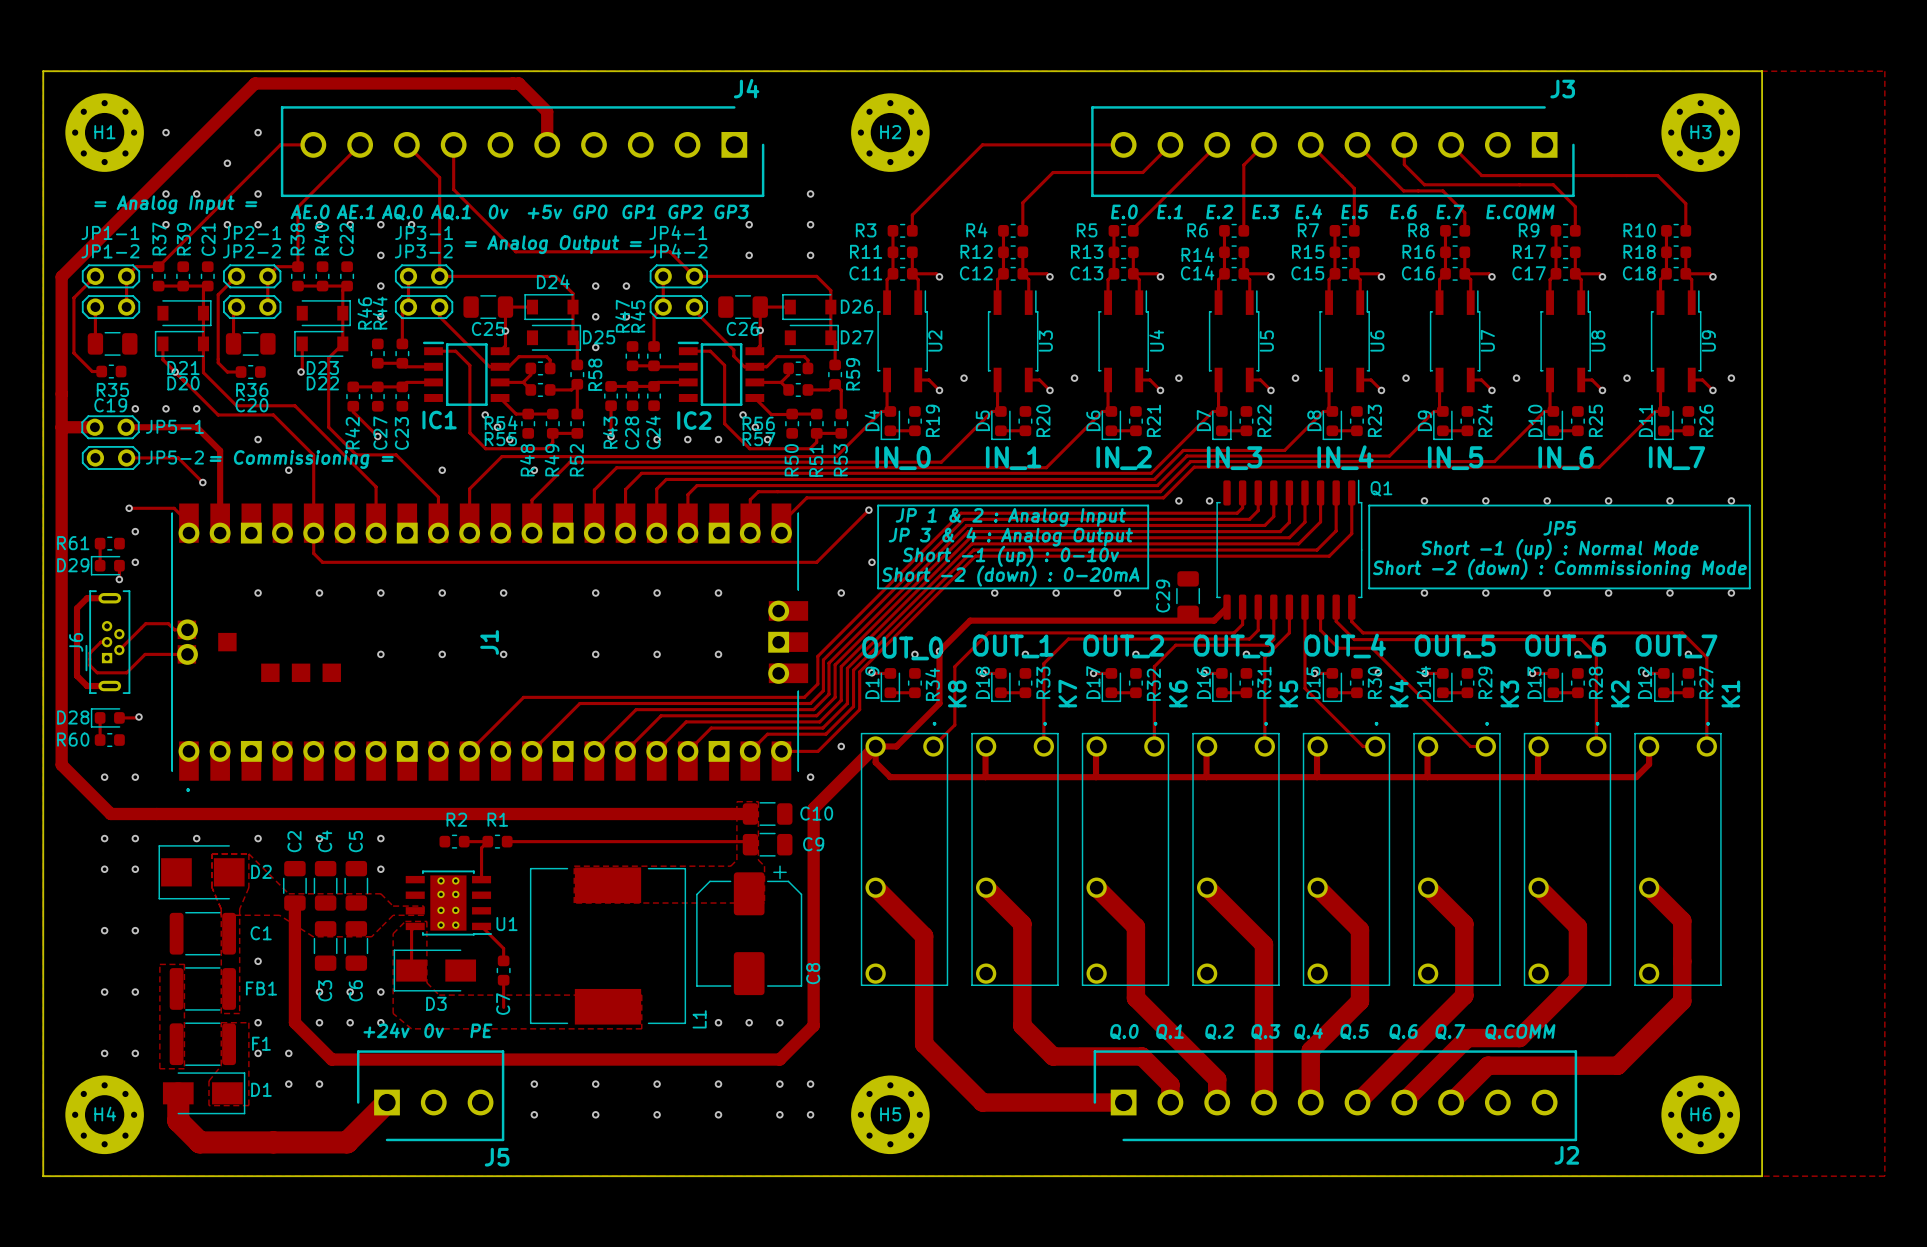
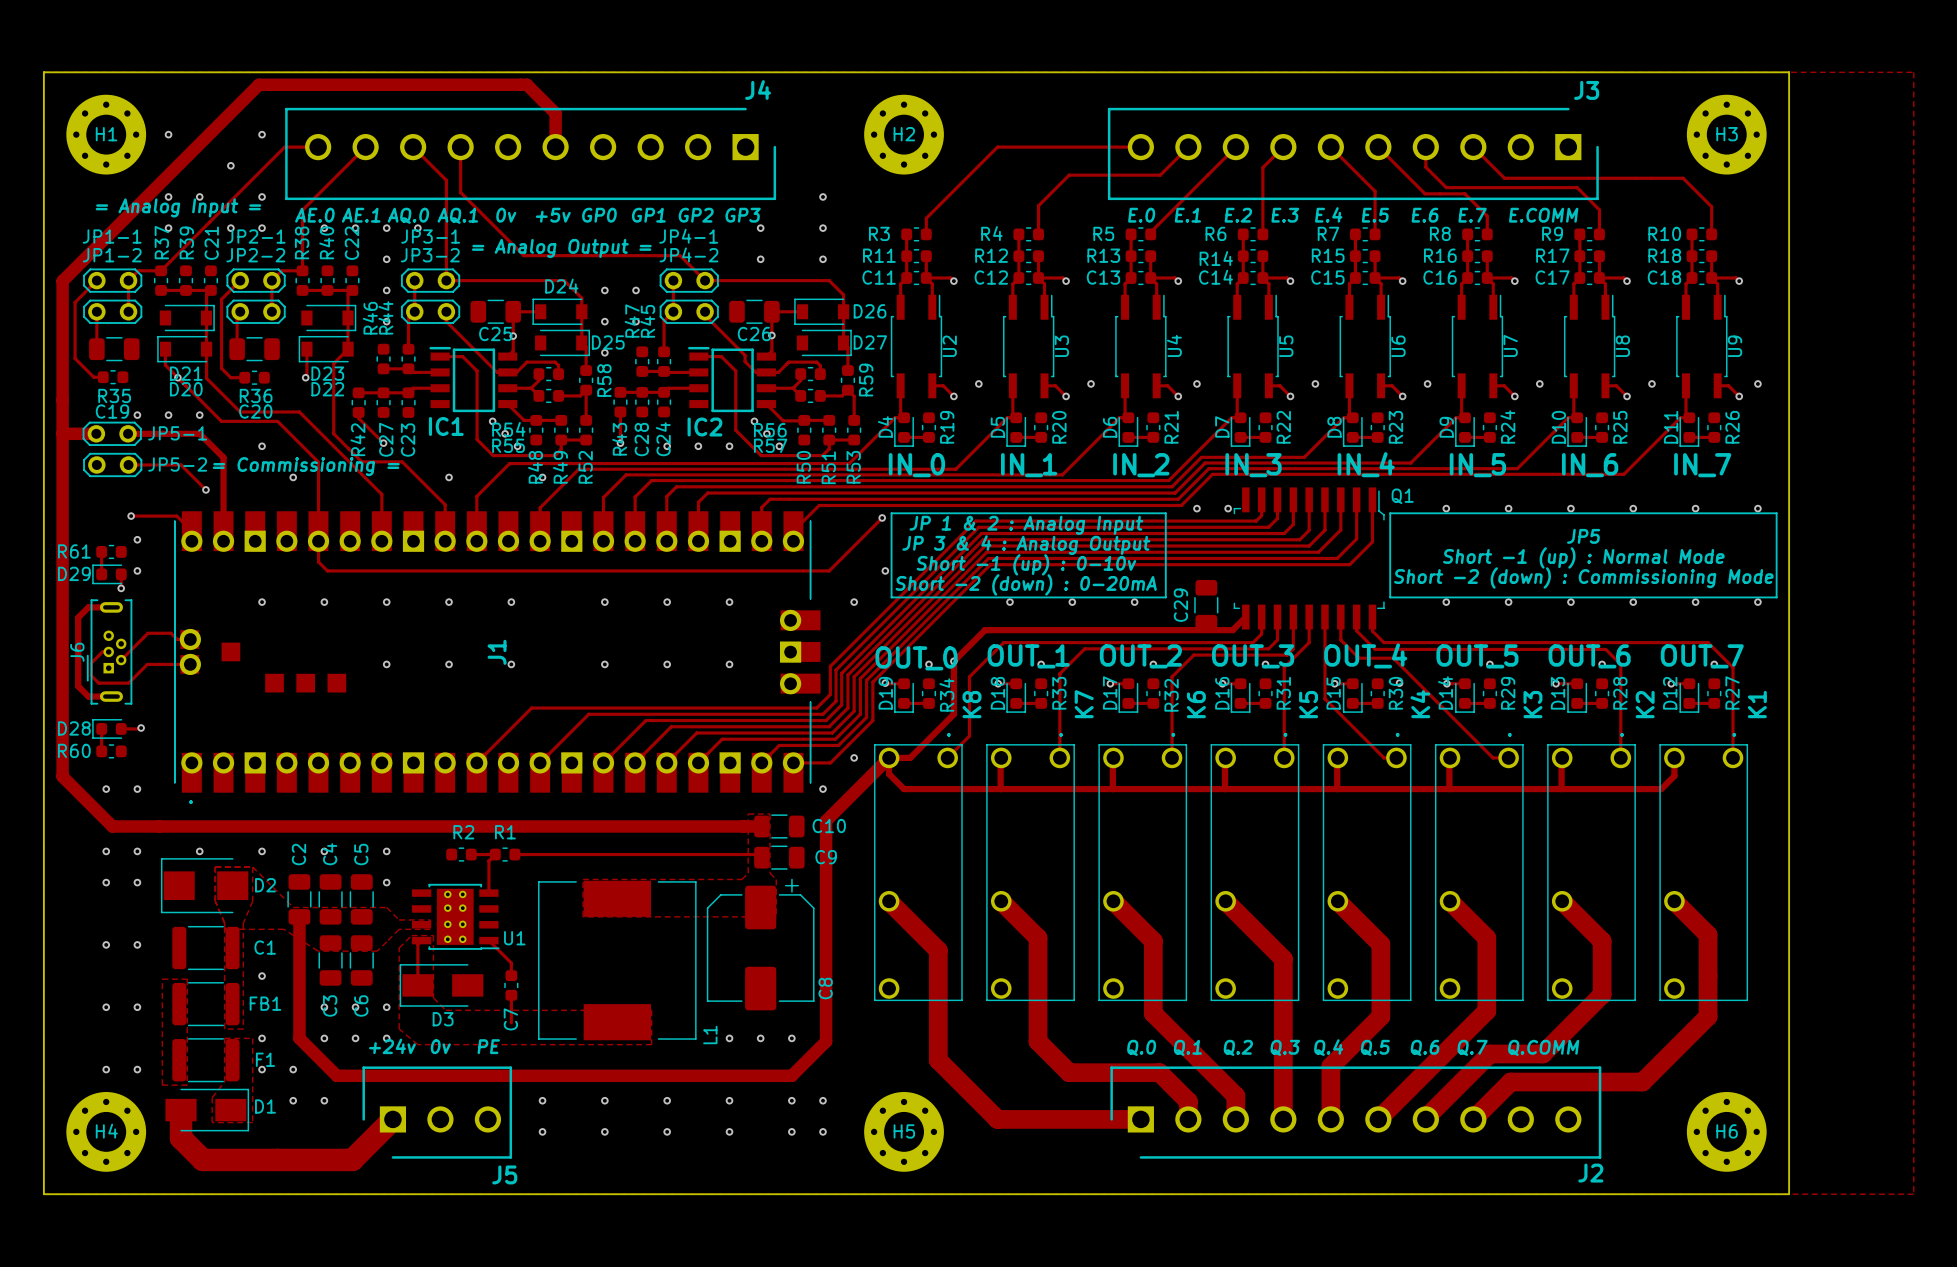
Q1 footprint: [1216, 479, 1363, 620] -> [1233, 487, 1385, 630]

